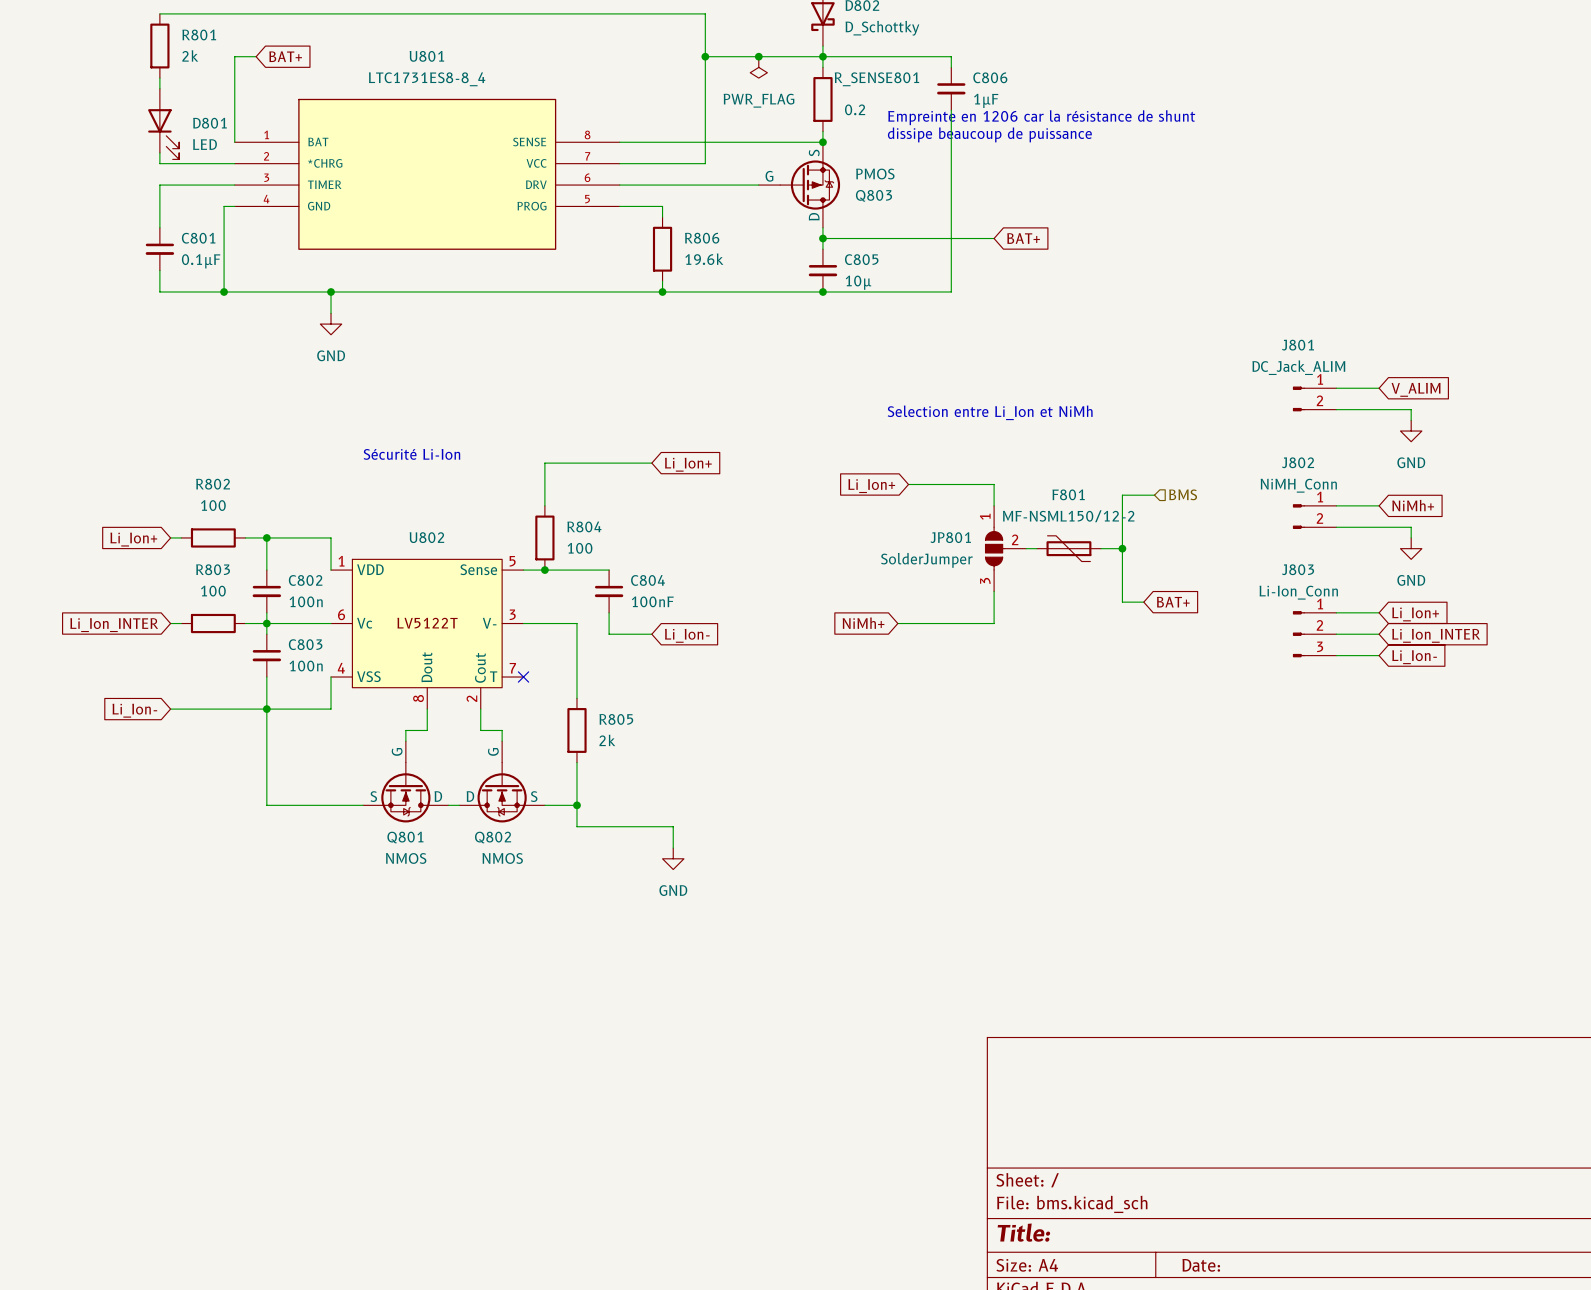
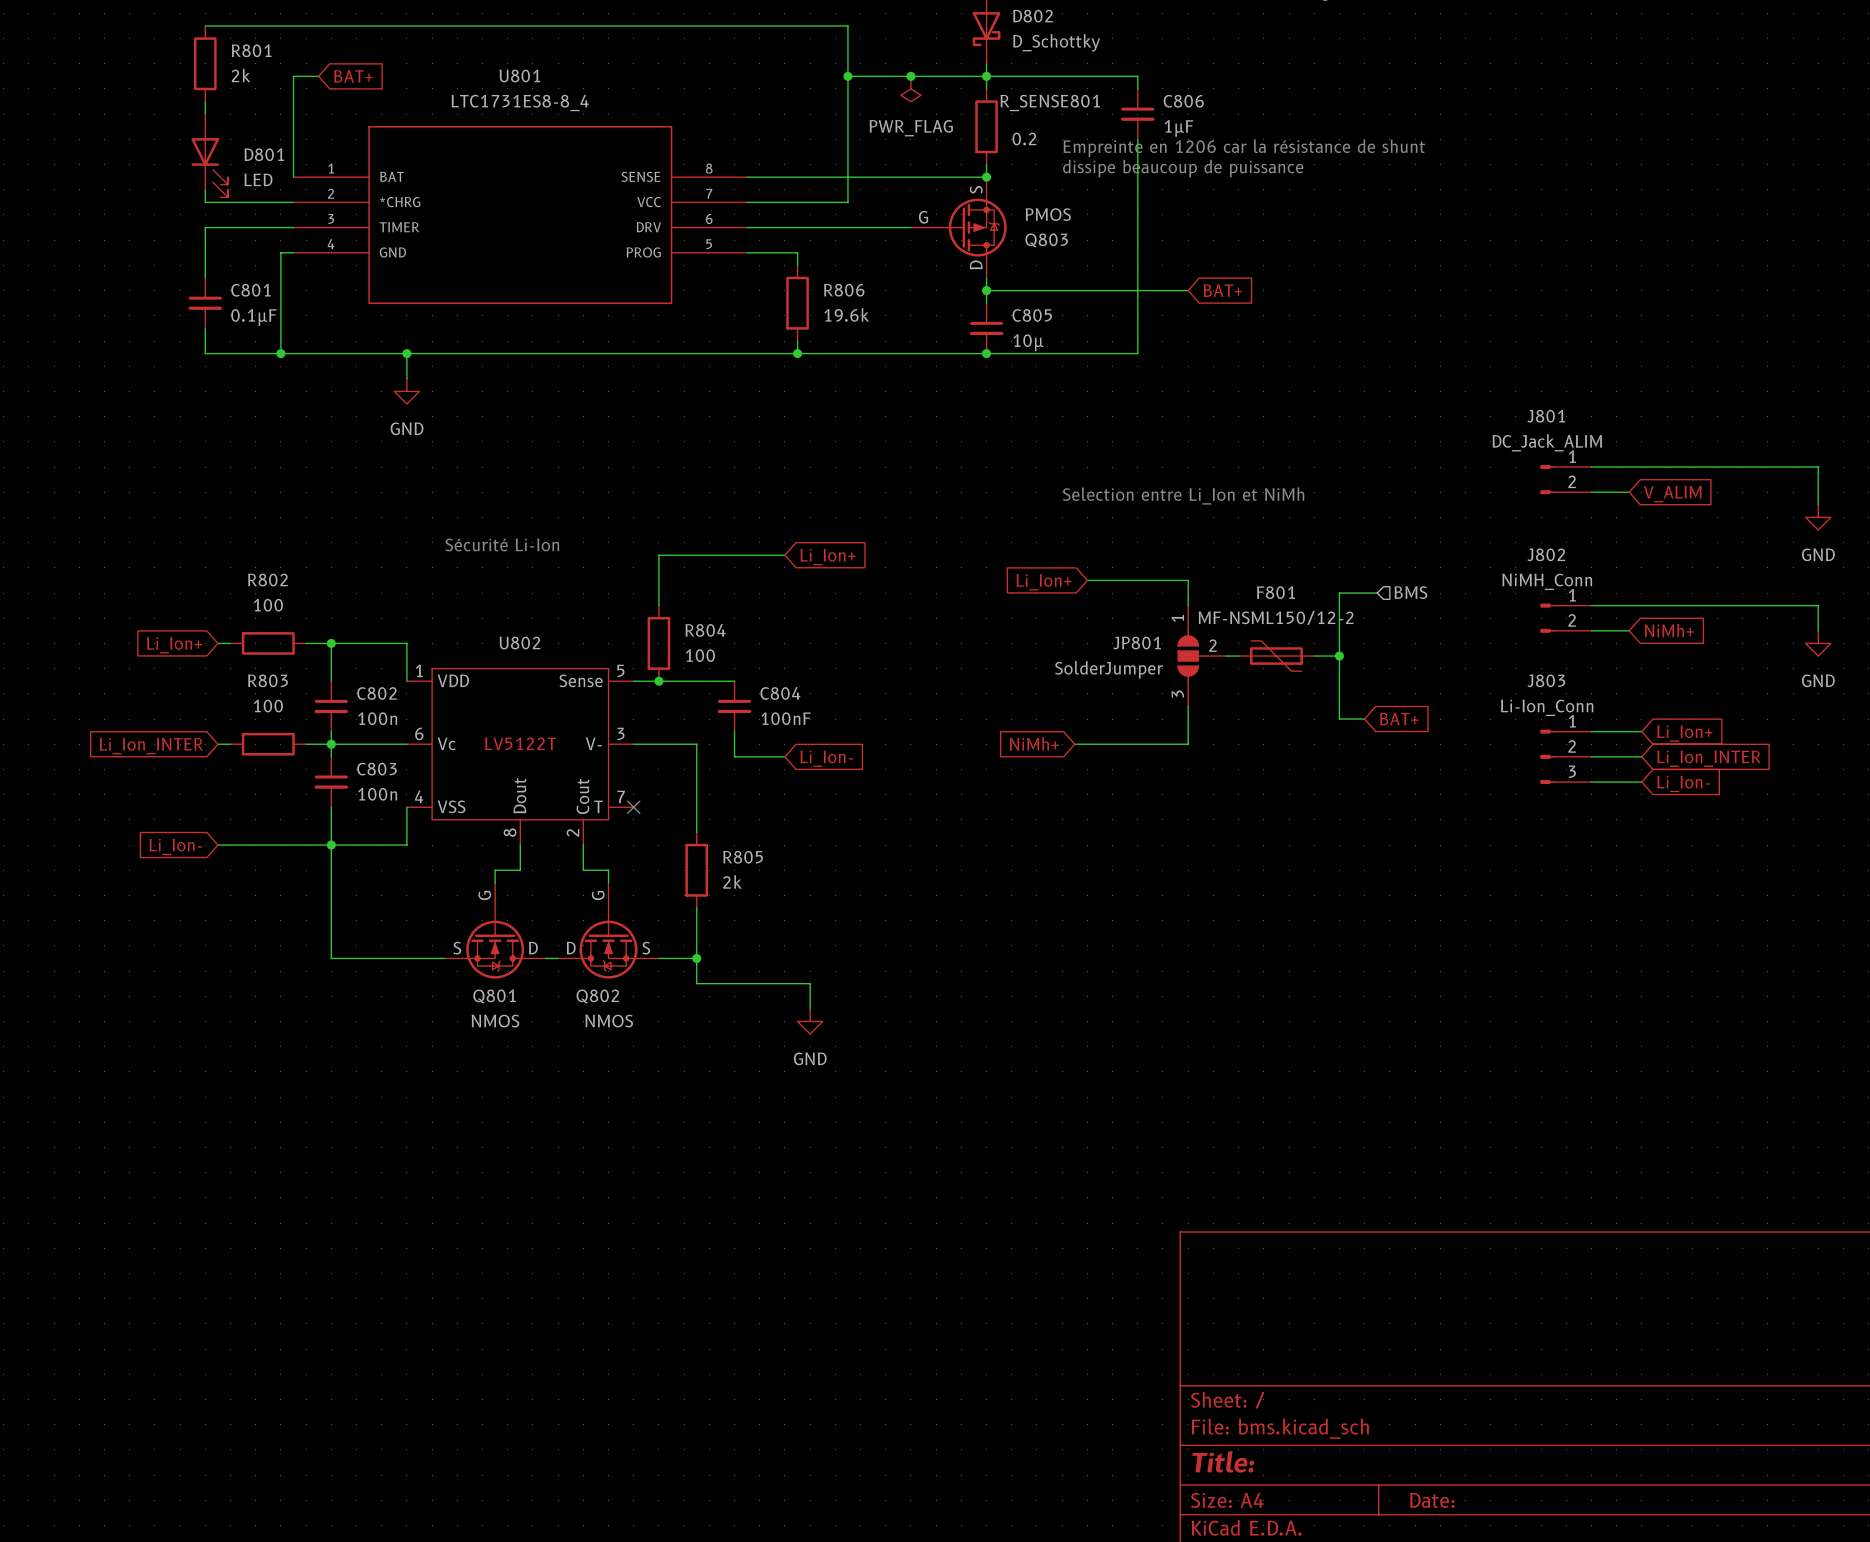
wire: none -> (1641, 467) (1818, 467) (1818, 504)
global label position: V_ALIM (1416, 389) -> V_ALIM (1672, 494)
wire: (1368, 409) (1411, 409) (1411, 420) -> none
power symbol: GND (1411, 431) -> none
power symbol: none -> GND (1818, 517)
wire: none -> (1641, 605) (1818, 605) (1818, 630)
global label position: NiMh+ (1413, 505) -> NiMh+ (1669, 630)
wire: (1368, 527) (1411, 527) (1411, 537) -> none
power symbol: none -> GND (1818, 643)
power symbol: GND (1411, 548) -> none

